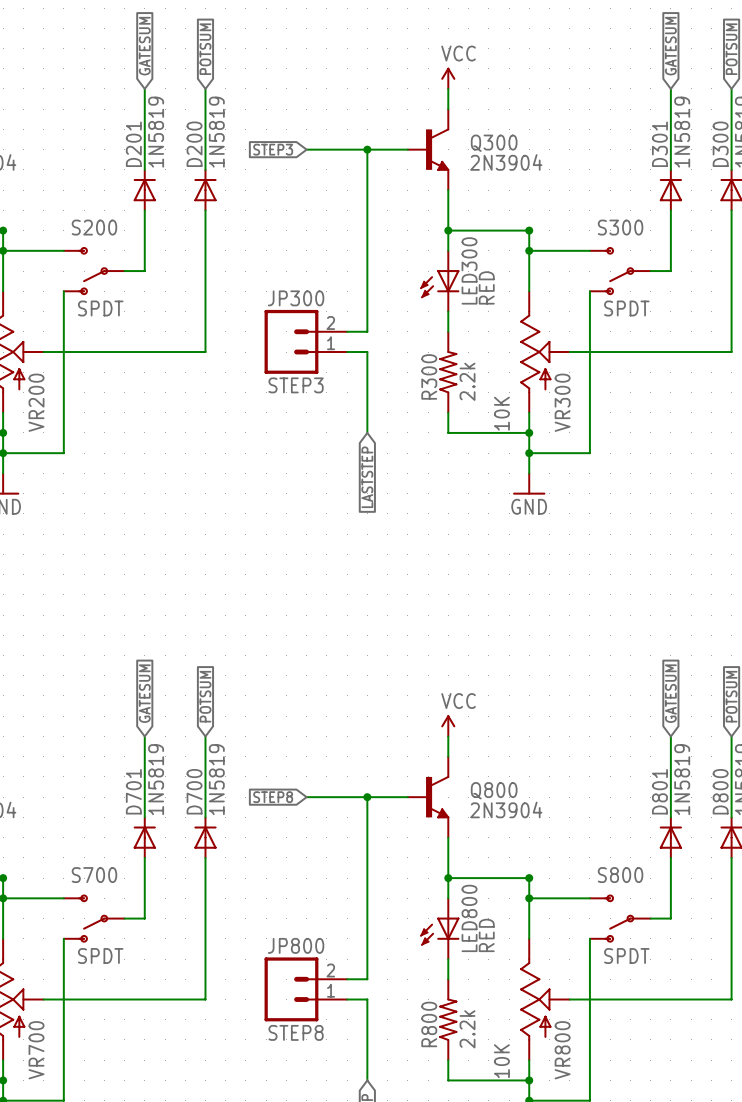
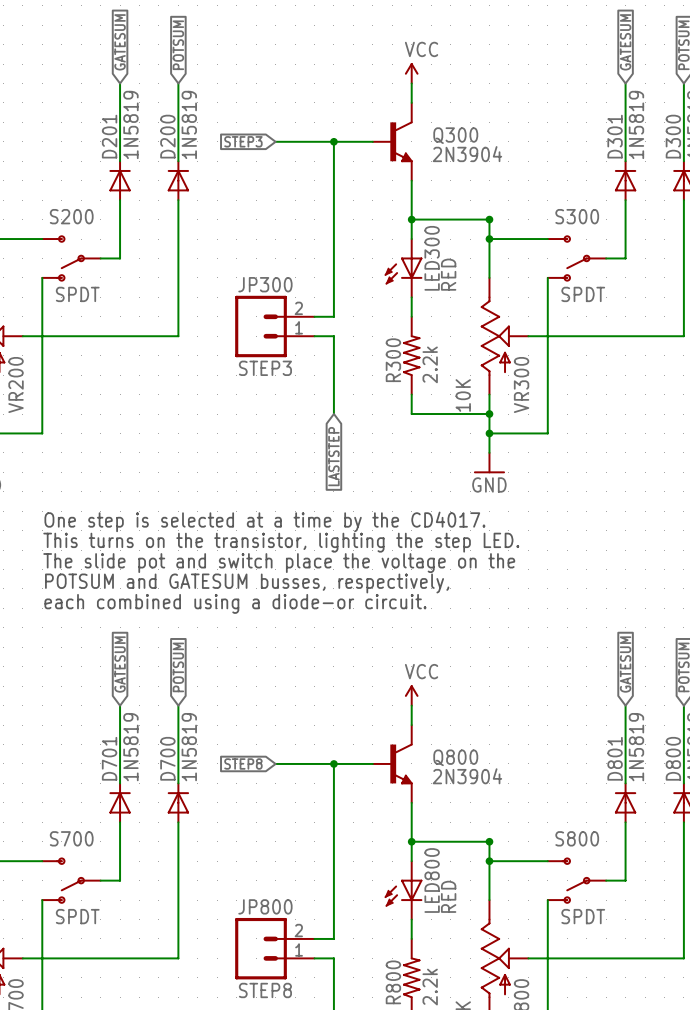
text: none -> One step is selected at a time by the CD4017. (264, 521)
text: none -> This turns on the transistor, lighting the step LED. (281, 542)
text: none -> The slide pot and switch place the voltage on the (279, 563)
text: none -> POTSUM and GATESUM busses, respectively, (247, 583)
text: none -> each combined using a diode-or circuit. (235, 603)

